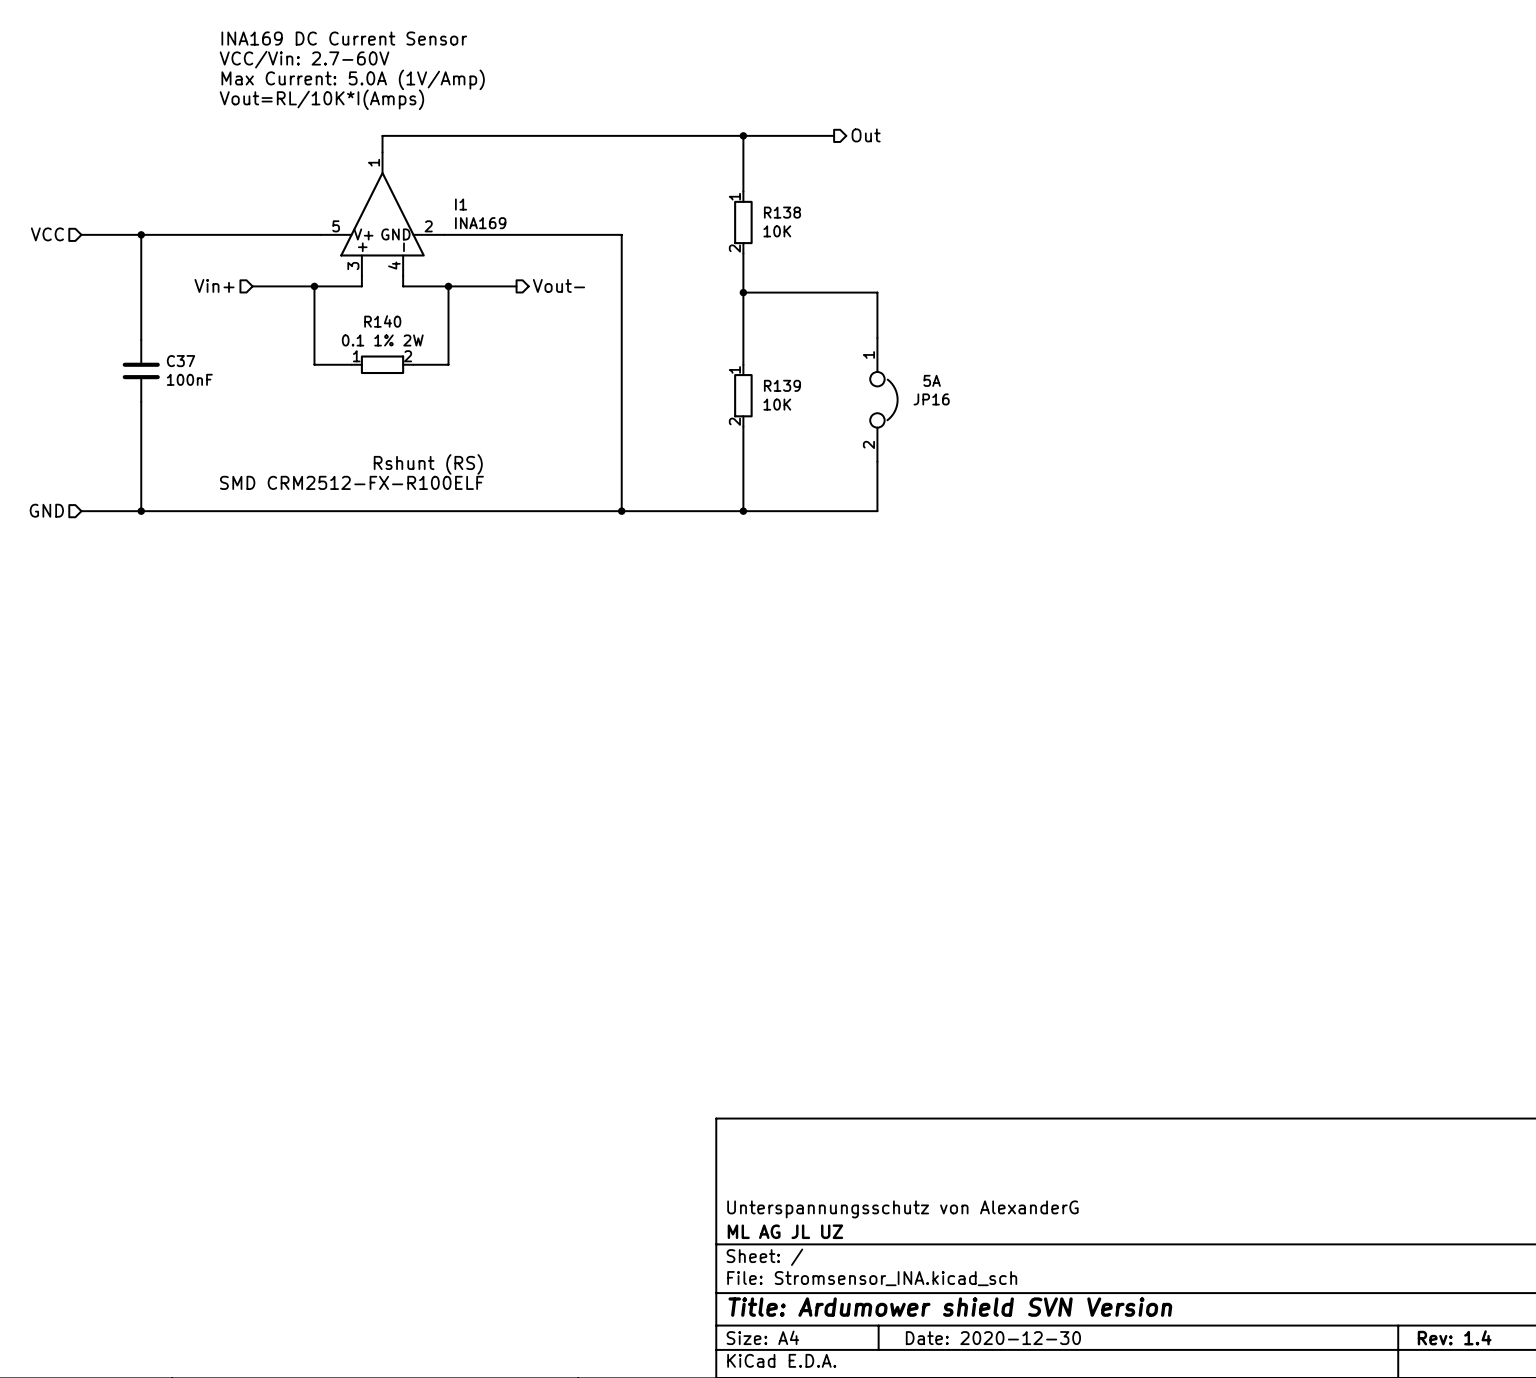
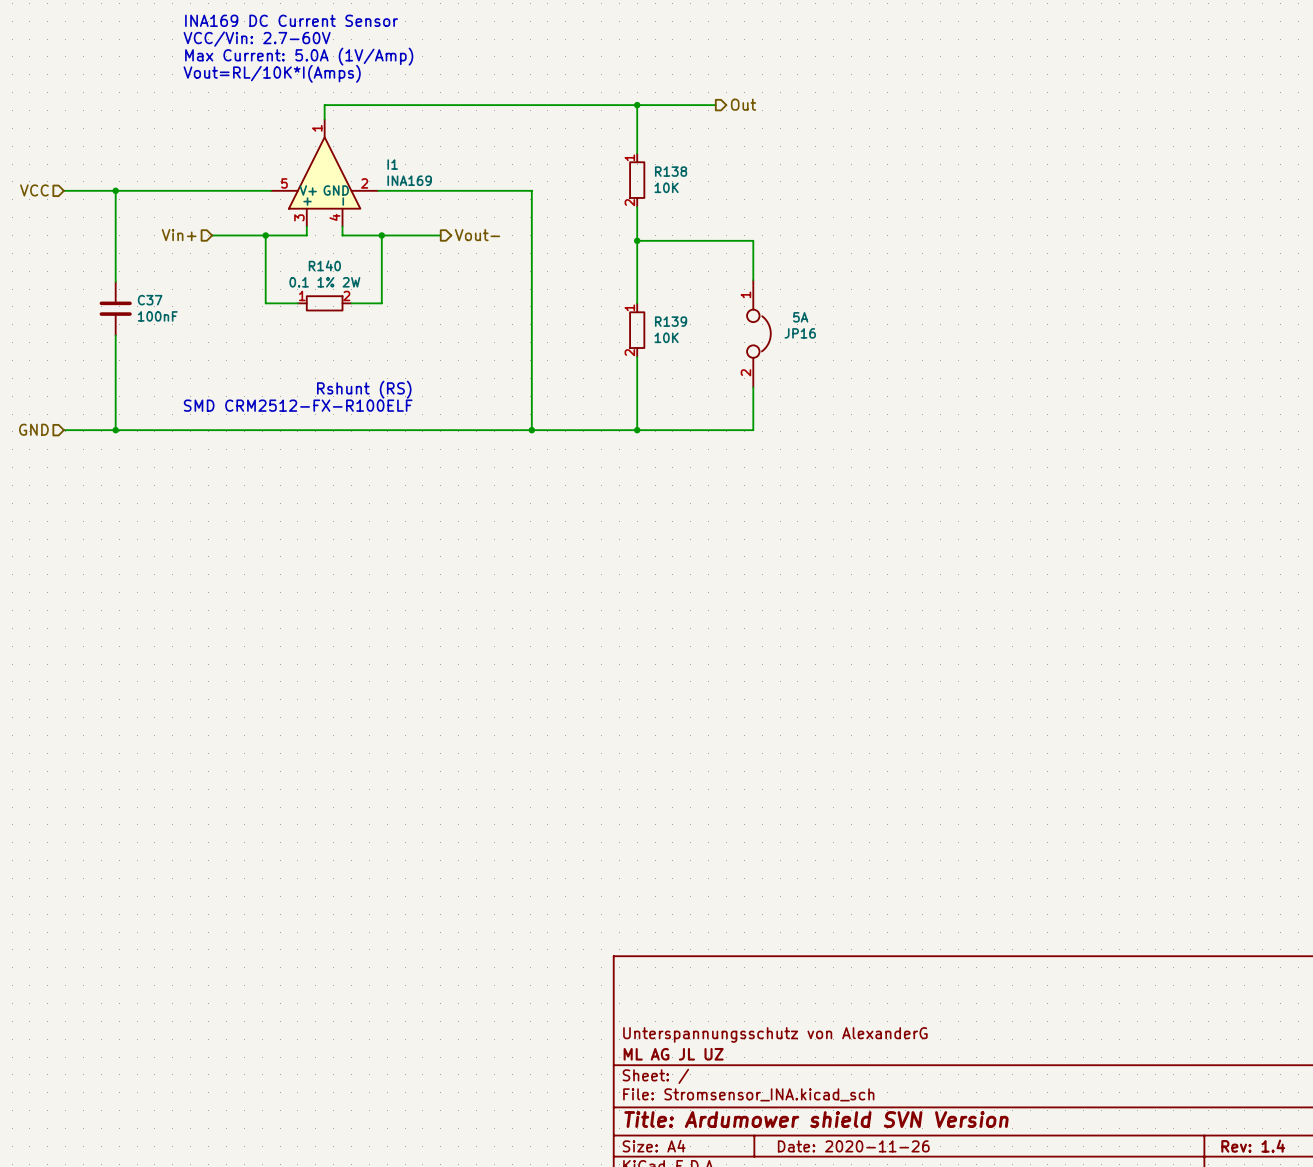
title block: Date: 2020-12-30 (993, 1338) -> Date: 2020-11-26 (853, 1146)

